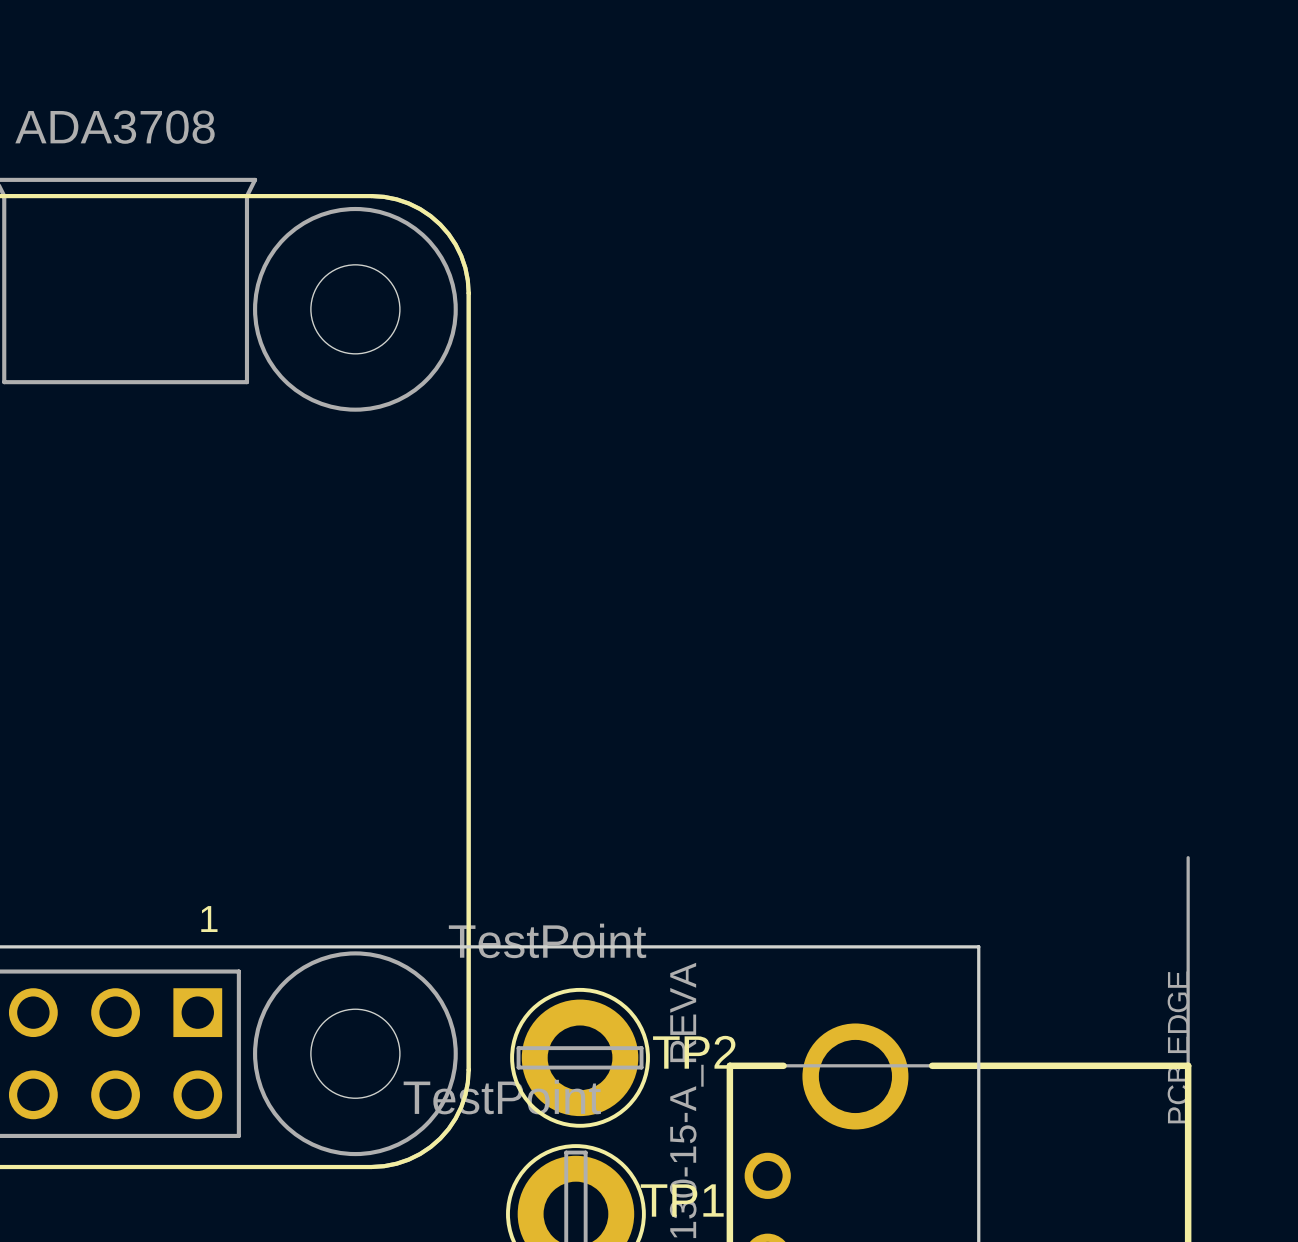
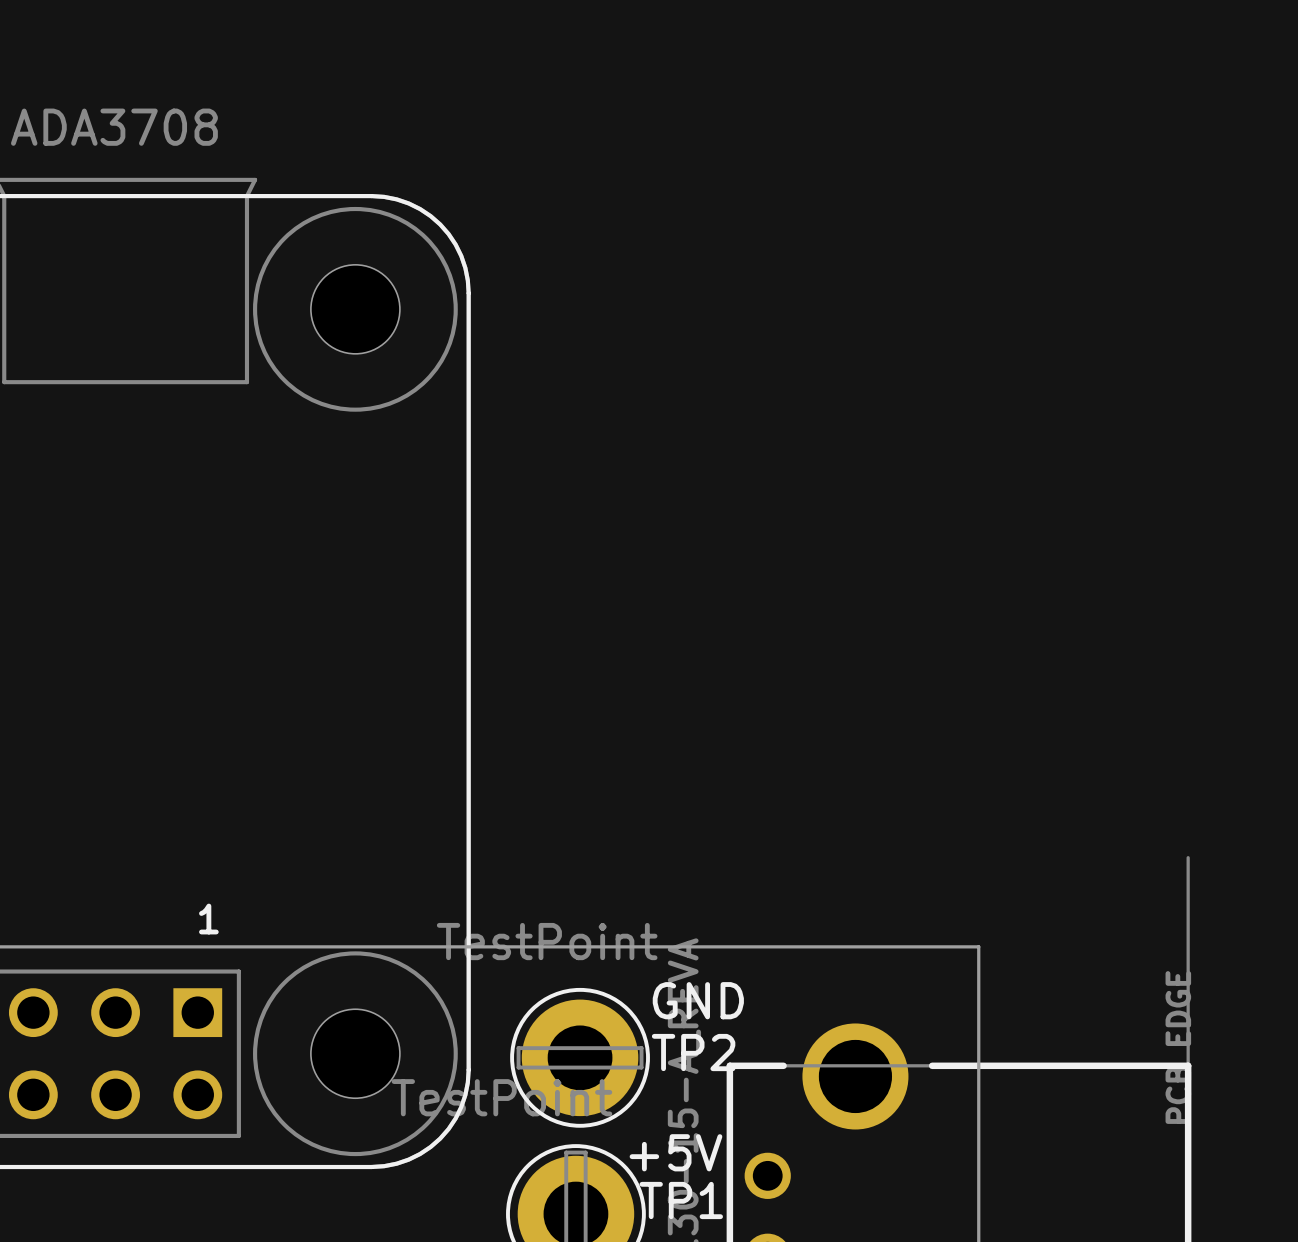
text: none -> GND (698, 1000)
text: none -> +5V (675, 1152)

